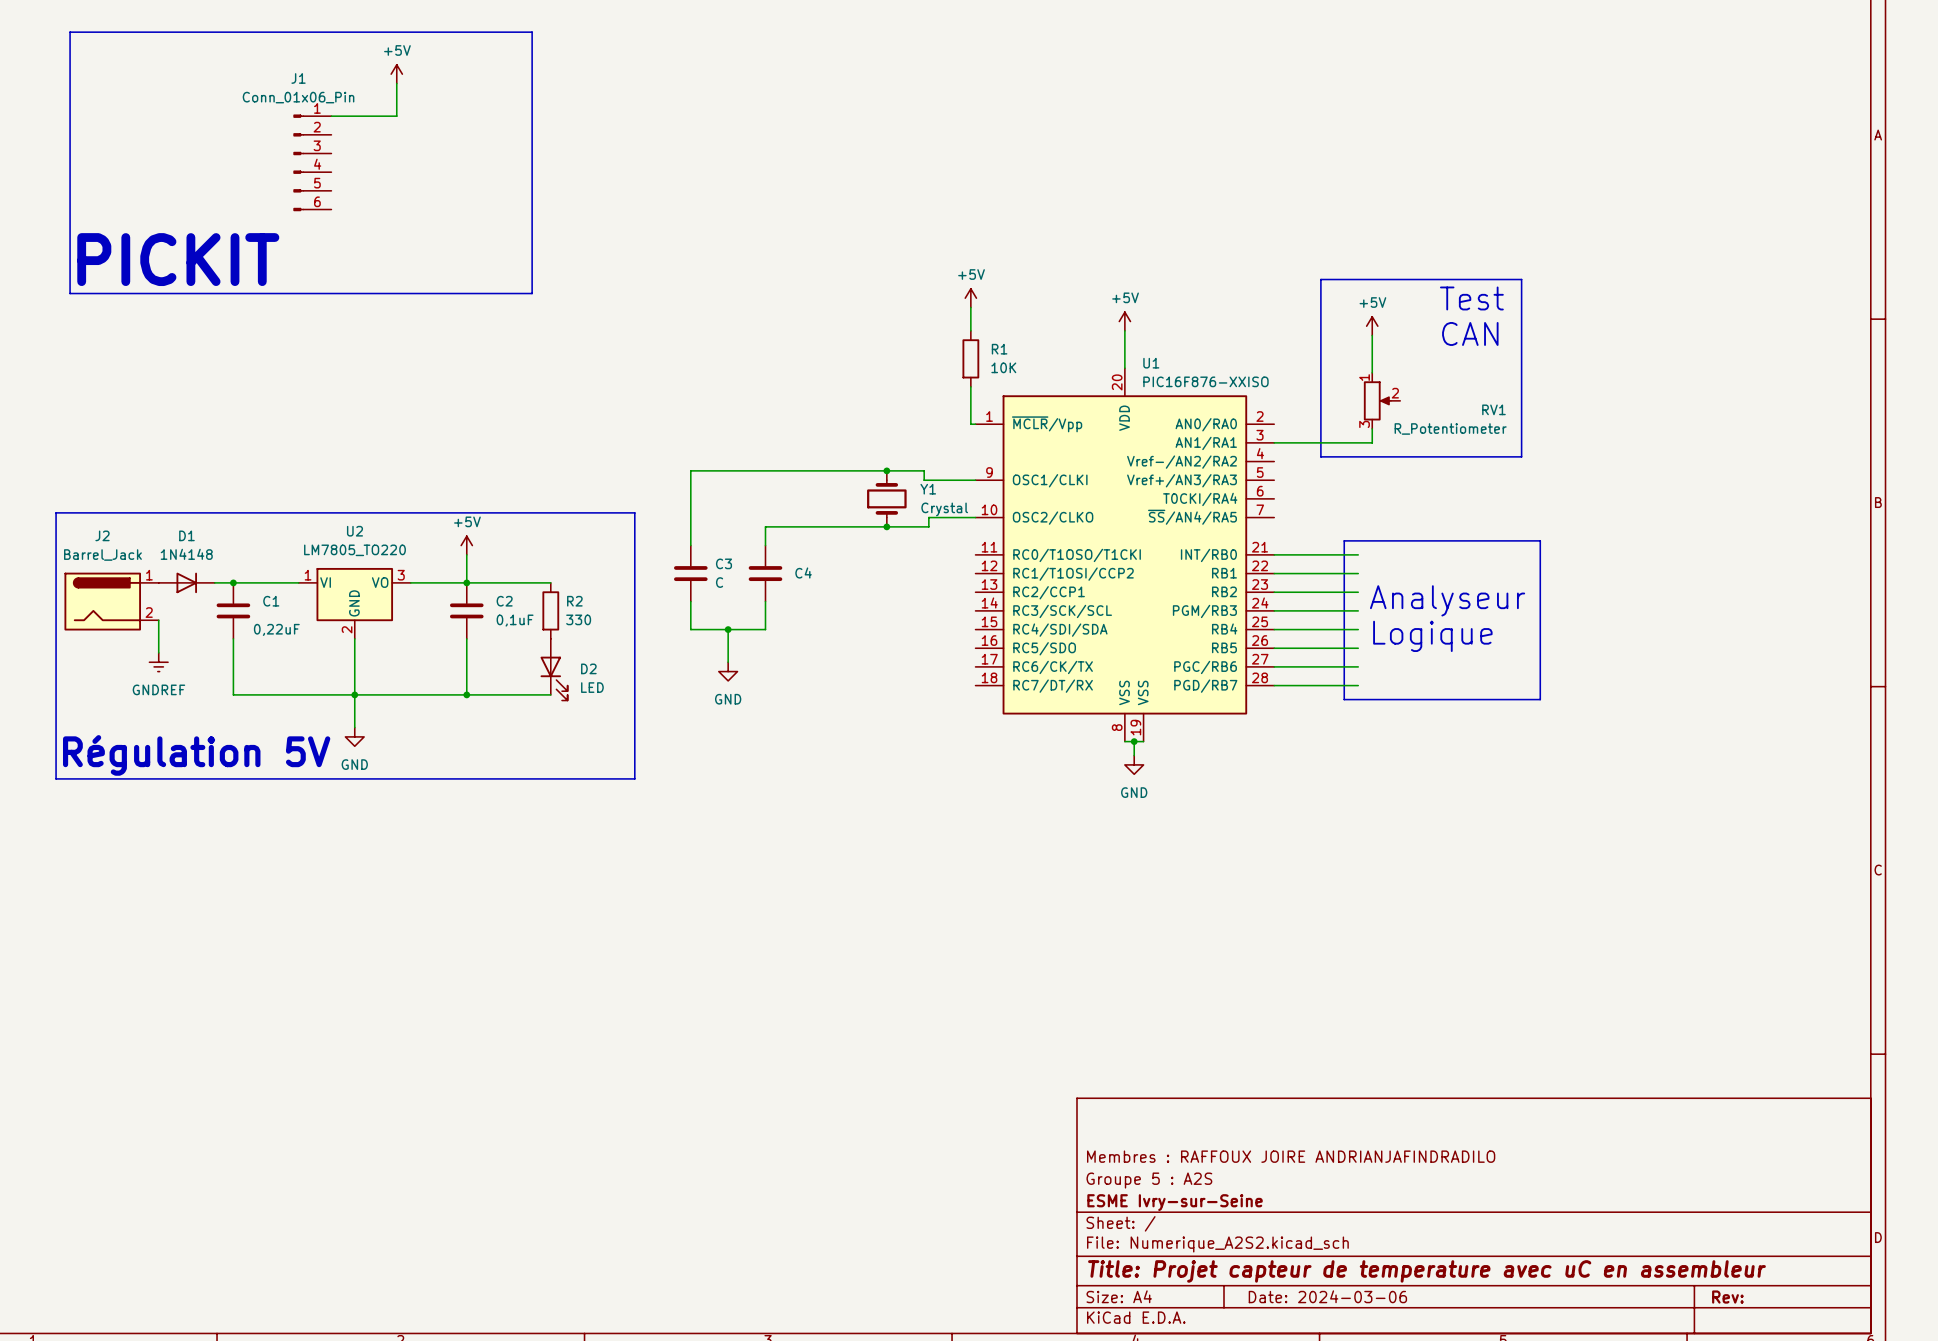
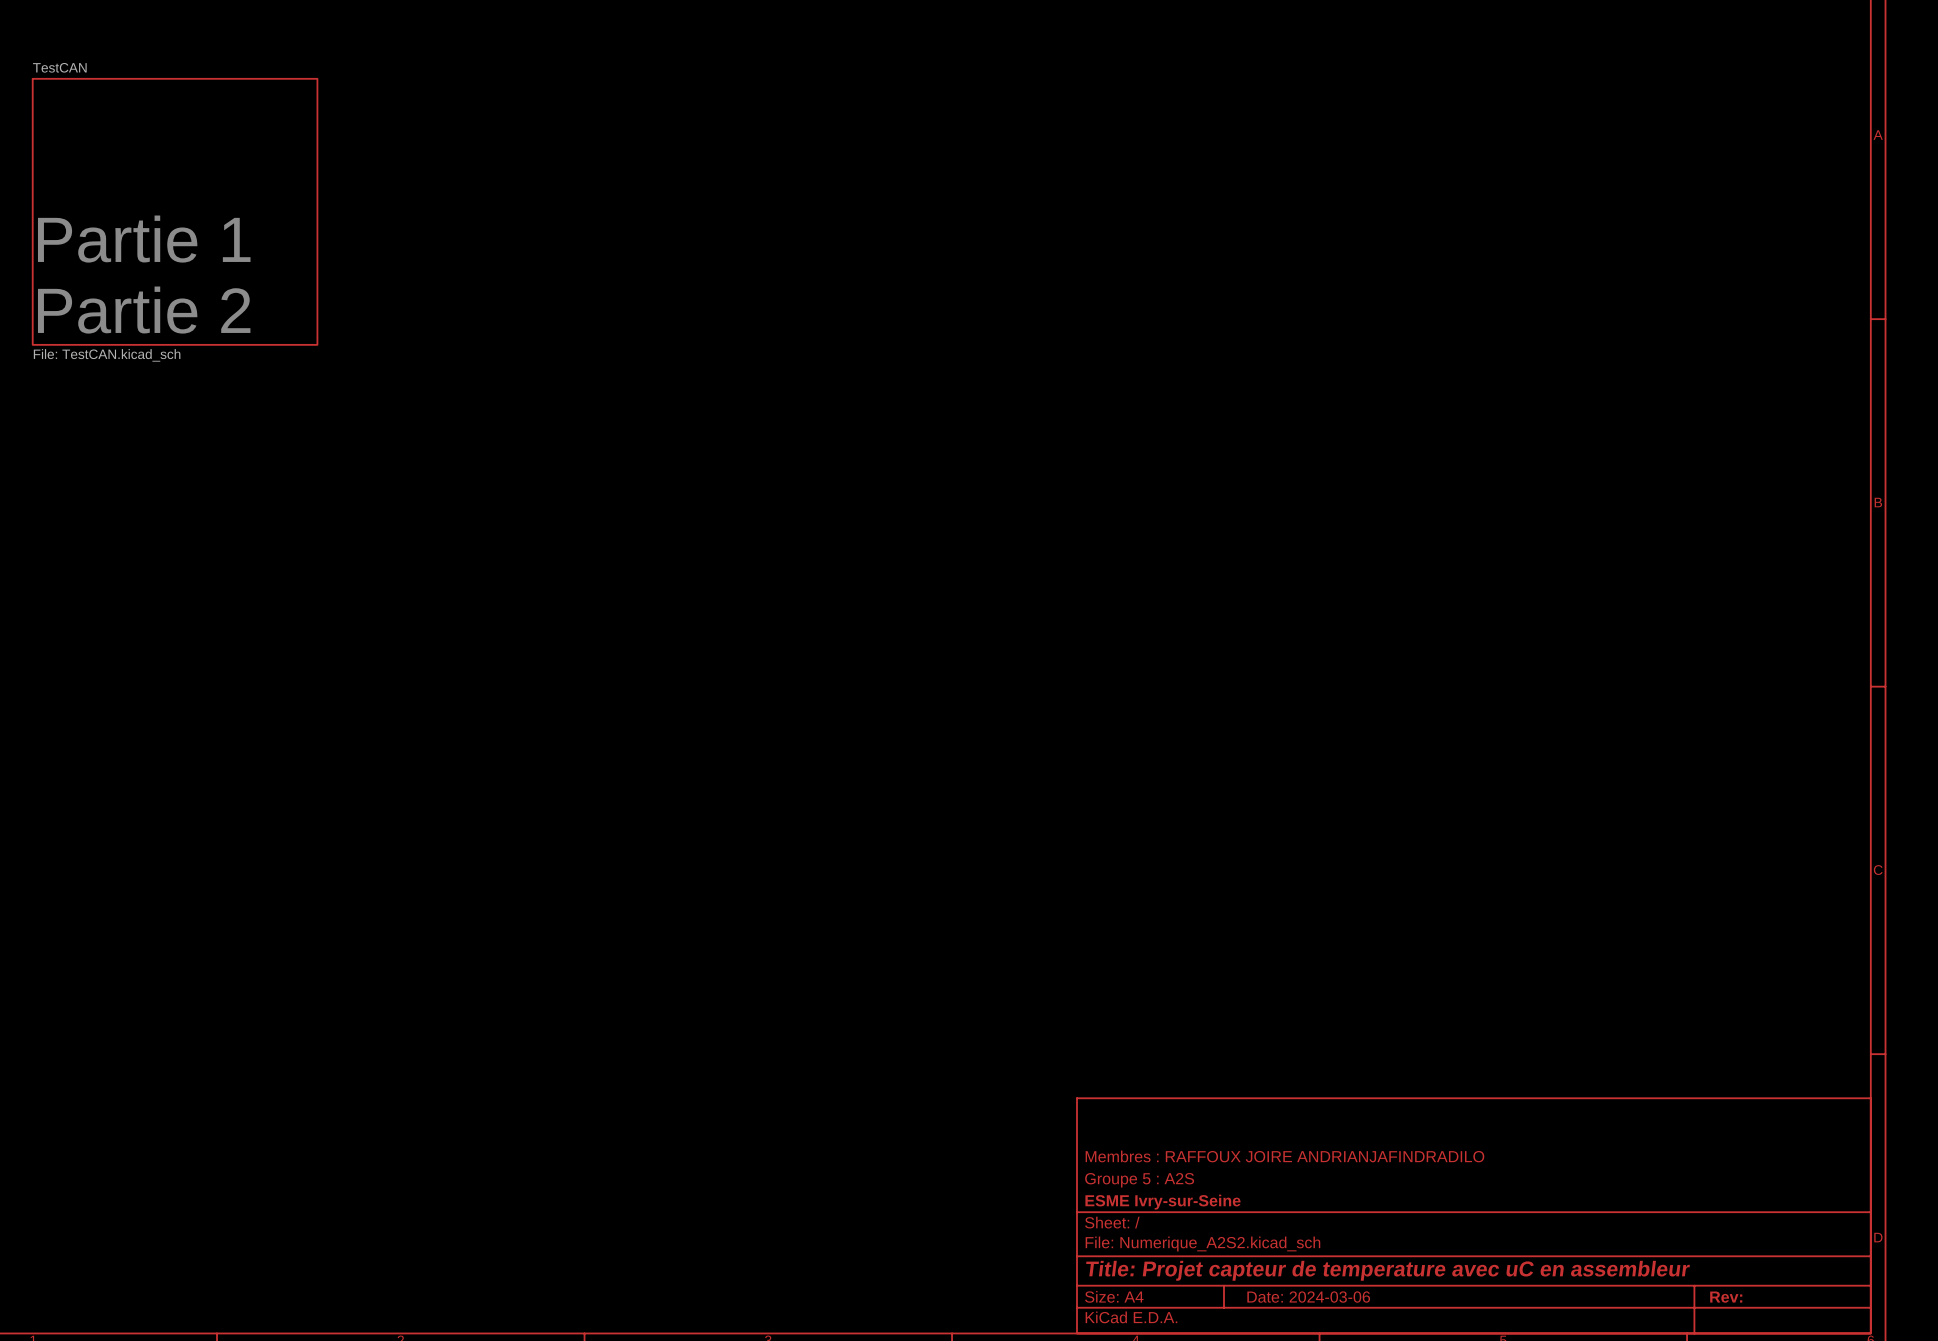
bus: (70, 32) (532, 32) (532, 293) (70, 293) (70, 32) -> none
power symbol: +5V (396, 74) -> none
wire: (396, 83) (396, 116) (331, 116) -> none
J1: Conn_01x06_Pin (312, 162) -> none
sheet TestCAN: none -> File: TestCAN.kicad_sch (175, 211)
text: none -> Partie 1 (144, 239)
text: PICKIT (178, 259) -> none
bus: (1320, 279) (1521, 279) (1521, 456) (1320, 456) (1320, 279) -> none
power symbol: +5V (970, 298) -> none
text: Test (1471, 298) -> none
wire: (970, 307) (970, 330) -> none
text: none -> Partie 2 (144, 310)
power symbol: +5V (1124, 321) -> none
power symbol: +5V (1372, 326) -> none
wire: (1124, 330) (1124, 368) -> none
text: CAN (1470, 333) -> none
wire: (1372, 335) (1372, 372) -> none
R1: 10K (970, 358) -> none
wire: (970, 386) (970, 424) (975, 424) -> none
RV1: R_Potentiometer (1382, 400) -> none
wire: (1372, 428) (1372, 442) (1274, 442) -> none
junction: (886, 470) -> none
wire: (975, 480) (924, 480) (924, 470) (690, 470) (690, 545) -> none
Y1: Crystal (886, 498) -> none
bus: (56, 512) (634, 512) (634, 778) (56, 778) (56, 512) -> none
wire: (975, 517) (928, 517) (928, 526) (765, 526) (765, 545) -> none
junction: (886, 526) -> none
bus: (1344, 540) (1540, 540) (1540, 699) (1344, 699) (1344, 540) -> none
power symbol: +5V (466, 545) -> none
wire: (466, 554) (466, 582) -> none
U1: PIC16F876-XXISO (1124, 554) -> none
wire: (1274, 554) (1358, 554) -> none
C3: C (690, 573) -> none
C4: (765, 573) -> none
wire: (1274, 573) (1358, 573) -> none
D1: 1N4148 (186, 582) -> none
wire: (214, 582) (298, 582) -> none
junction: (233, 582) -> none
wire: (410, 582) (550, 582) -> none
junction: (466, 582) -> none
wire: (1274, 592) (1358, 592) -> none
text: Analyseur (1447, 600) -> none
J2: Barrel_Jack (111, 601) -> none
wire: (690, 601) (690, 629) (765, 629) (765, 601) -> none
U2: LM7805_TO220 (354, 603) -> none
C1: 0,22uF (233, 610) -> none
C2: 0,1uF (466, 610) -> none
R2: 330 (550, 610) -> none
wire: (1274, 610) (1358, 610) -> none
wire: (158, 620) (158, 652) -> none
wire: (728, 629) (728, 662) -> none
junction: (728, 629) -> none
wire: (1274, 629) (1358, 629) -> none
text: Logique (1432, 636) -> none
wire: (233, 638) (233, 694) (550, 694) -> none
wire: (354, 638) (354, 727) -> none
wire: (466, 638) (466, 694) -> none
wire: (1274, 648) (1358, 648) -> none
power symbol: GNDREF (158, 662) -> none
wire: (1274, 666) (1358, 666) -> none
D2: LED (554, 669) -> none
power symbol: GND (728, 671) -> none
wire: (1274, 685) (1358, 685) -> none
junction: (354, 694) -> none
junction: (466, 694) -> none
power symbol: GND (354, 736) -> none
wire: (1124, 741) (1143, 741) -> none
wire: (1134, 741) (1134, 755) -> none
junction: (1134, 741) -> none
text: Régulation 5V (196, 755) -> none
power symbol: GND (1134, 764) -> none

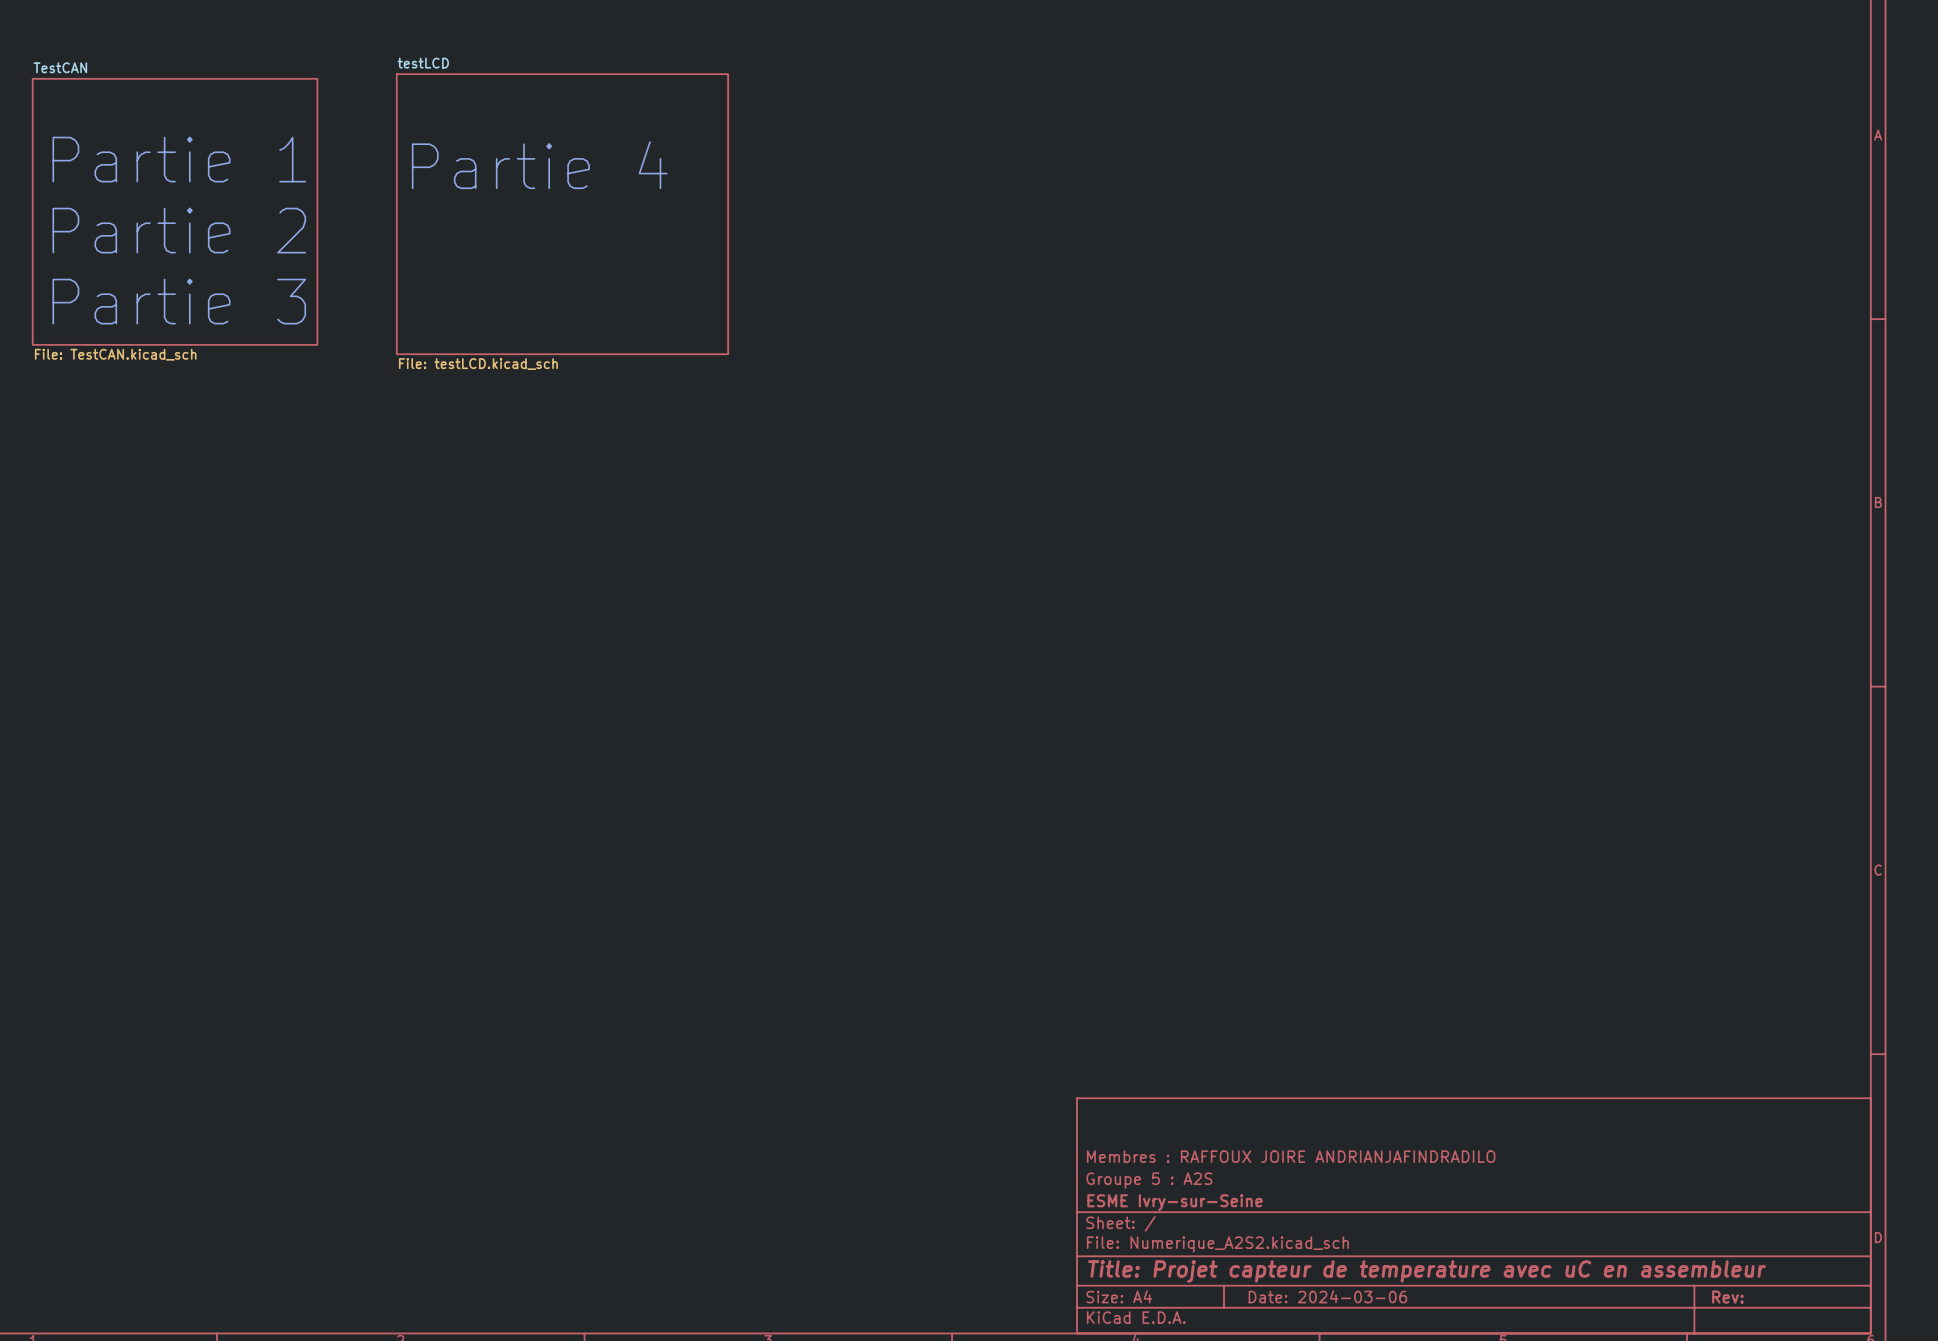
text: none -> Partie 4 (539, 165)
sheet testLCD: none -> File: testLCD.kicad_sch (562, 214)
text position: Partie 1 (144, 239) -> Partie 1 (179, 159)
text: none -> Partie 3 (179, 301)
text position: Partie 2 (144, 310) -> Partie 2 (179, 230)

